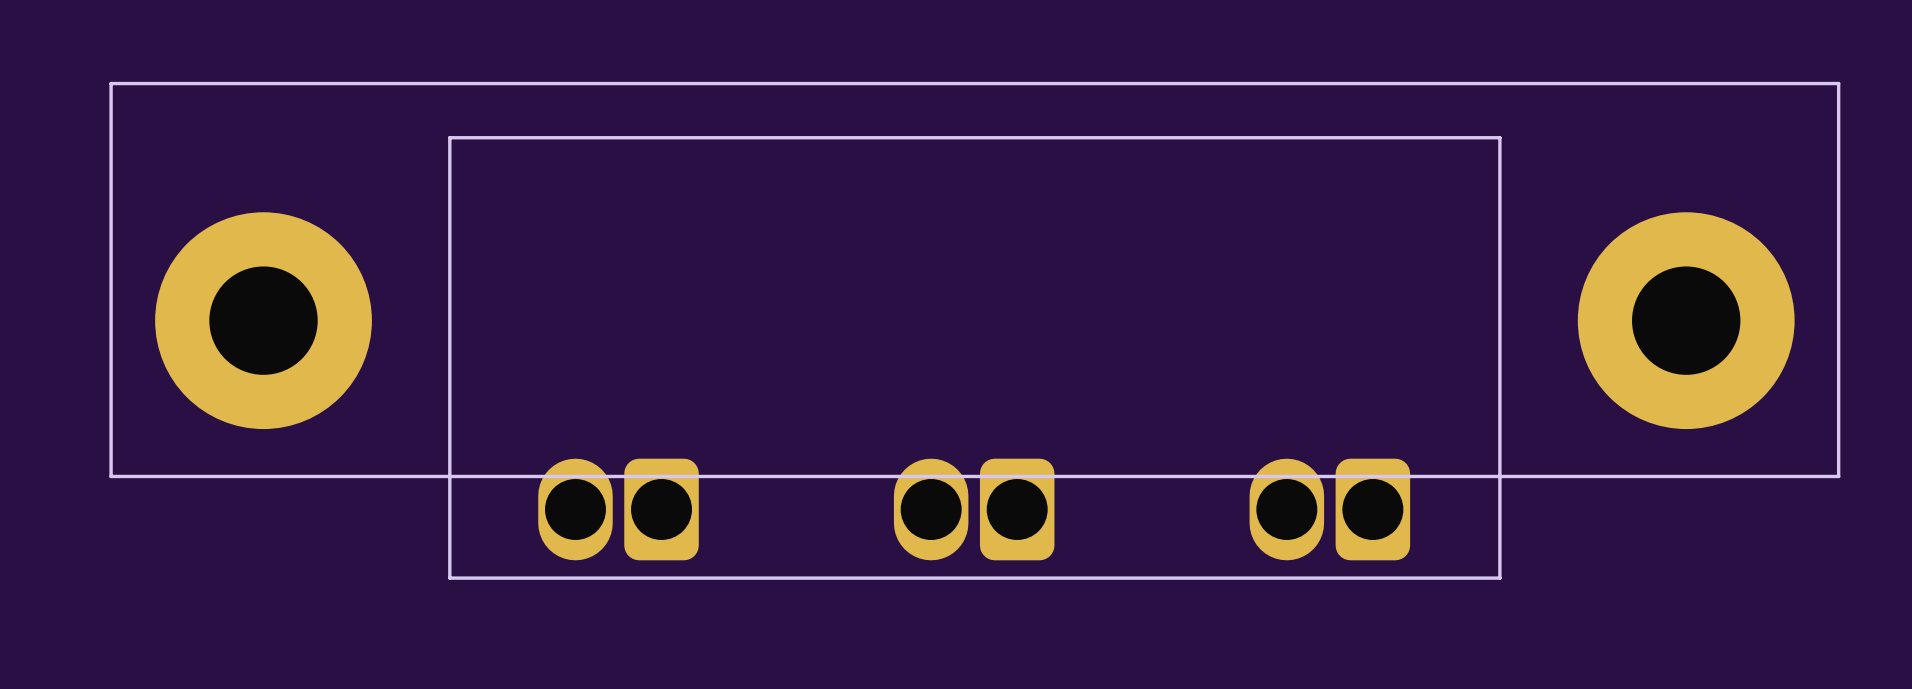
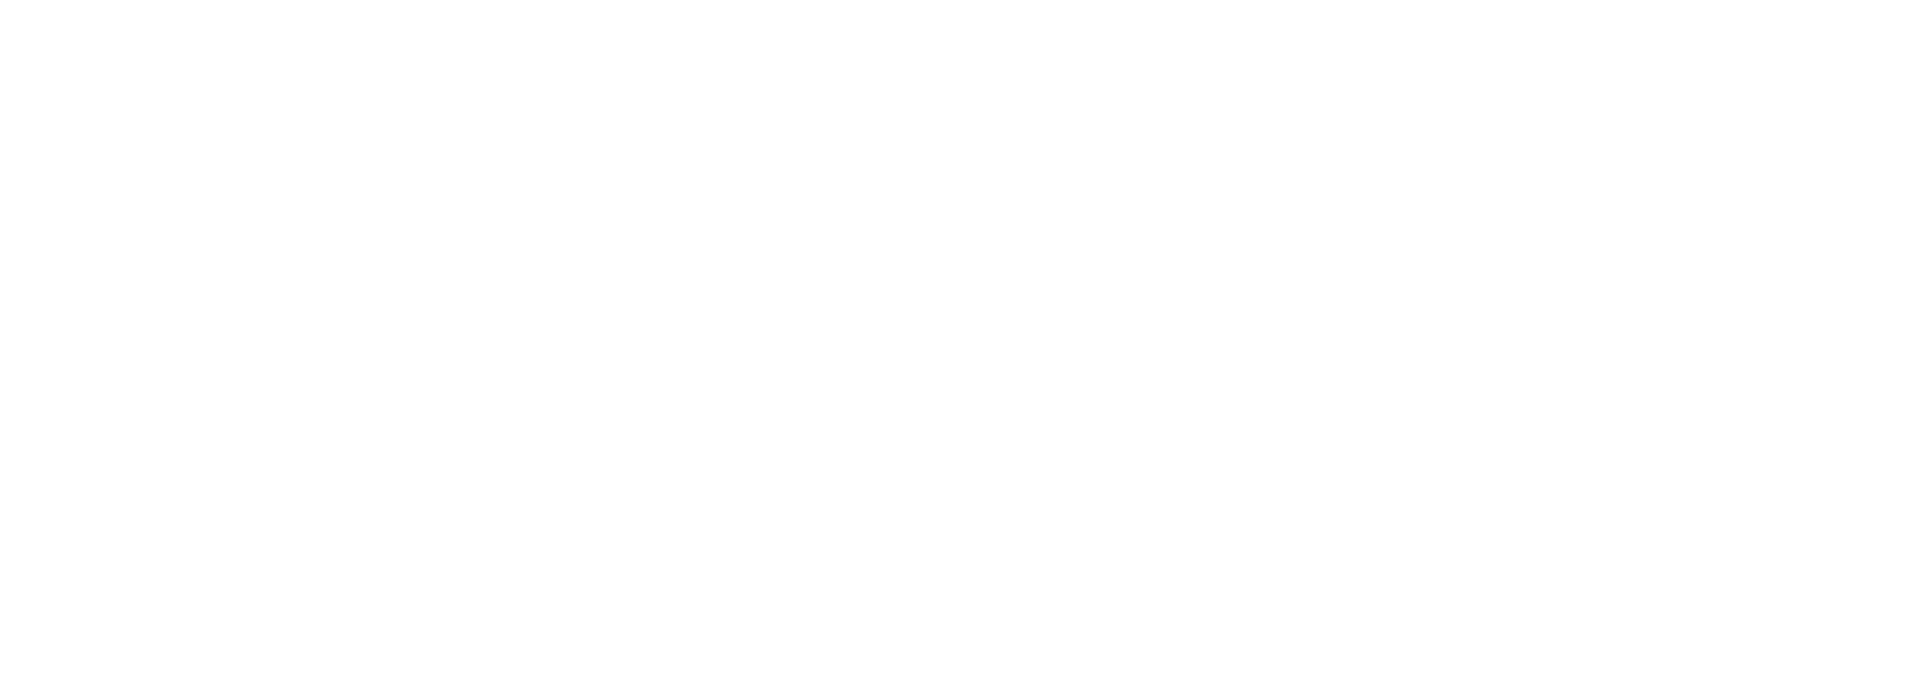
board edge: (1838, 83) (111, 83) (111, 476) (1838, 476) (1838, 83) -> none
board edge: (1499, 137) (449, 137) (449, 578) (1499, 578) (1499, 137) -> none
part: (263, 320) -> none
part: (1686, 320) -> none
part: (618, 509) -> none
part: (974, 509) -> none
part: (1329, 509) -> none

